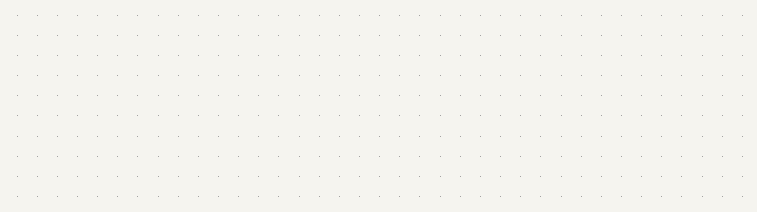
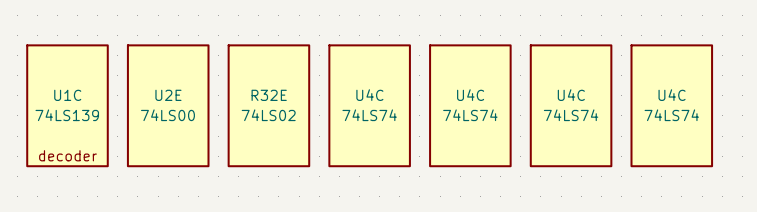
U1C: none -> 74LS139 (67, 105)
U2E: none -> 74LS00 (168, 105)
R32E: none -> 74LS02 (268, 105)
U4C: none -> 74LS74 (369, 105)
U4C: none -> 74LS74 (470, 105)
U4C: none -> 74LS74 (571, 105)
U4C: none -> 74LS74 (671, 105)

